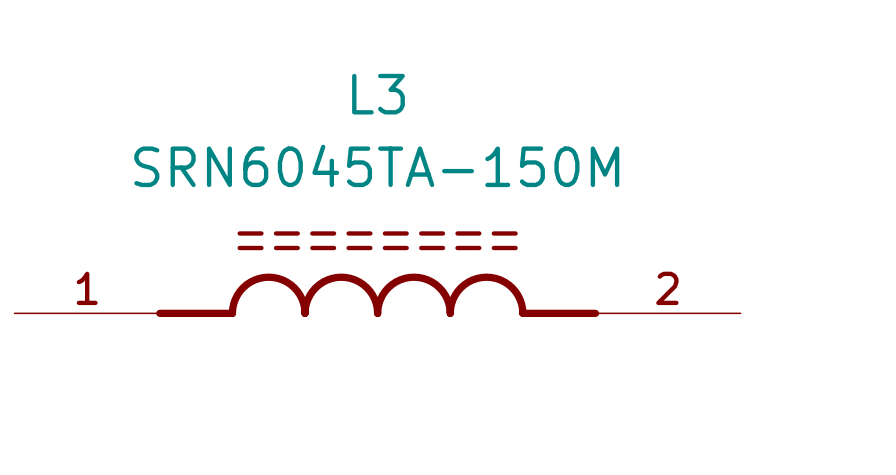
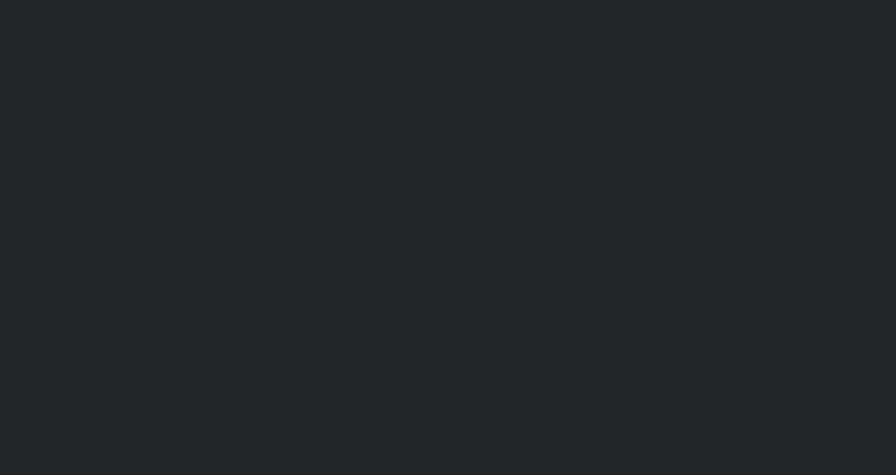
L3: SRN6045TA-150M (377, 274) -> none

